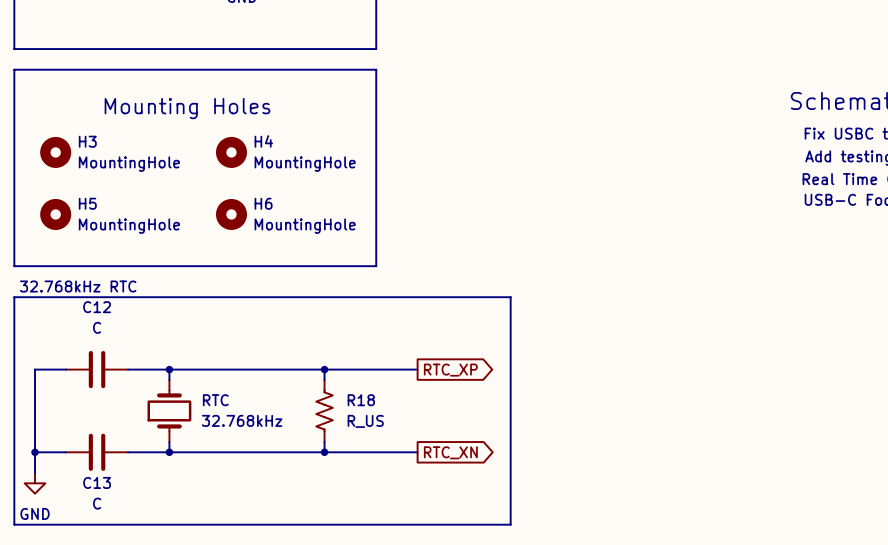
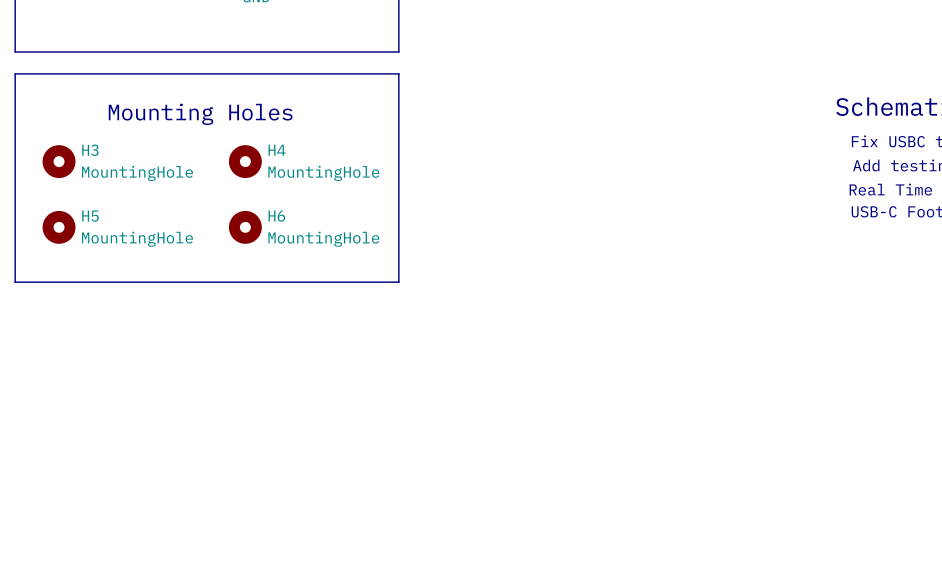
text: 32.768kHz RTC (78, 286) -> none
line: (14, 297) (510, 297) (510, 524) (14, 524) (14, 297) -> none
wire: (66, 369) (35, 369) (35, 472) -> none
C12: C (97, 369) -> none
wire: (128, 369) (417, 369) -> none
wire: (169, 369) (169, 379) -> none
junction: (169, 369) -> none
wire: (324, 369) (324, 379) -> none
junction: (324, 369) -> none
global label: RTC_XP (450, 370) -> none
RTC: 32.768kHz (169, 410) -> none
R18: R_US (324, 410) -> none
wire: (169, 441) (169, 452) -> none
wire: (324, 441) (324, 452) -> none
wire: (35, 452) (66, 452) -> none
junction: (35, 452) -> none
C13: C (97, 452) -> none
wire: (128, 452) (417, 452) -> none
junction: (169, 452) -> none
junction: (324, 452) -> none
global label: RTC_XN (450, 452) -> none
power symbol: GND (35, 483) -> none

